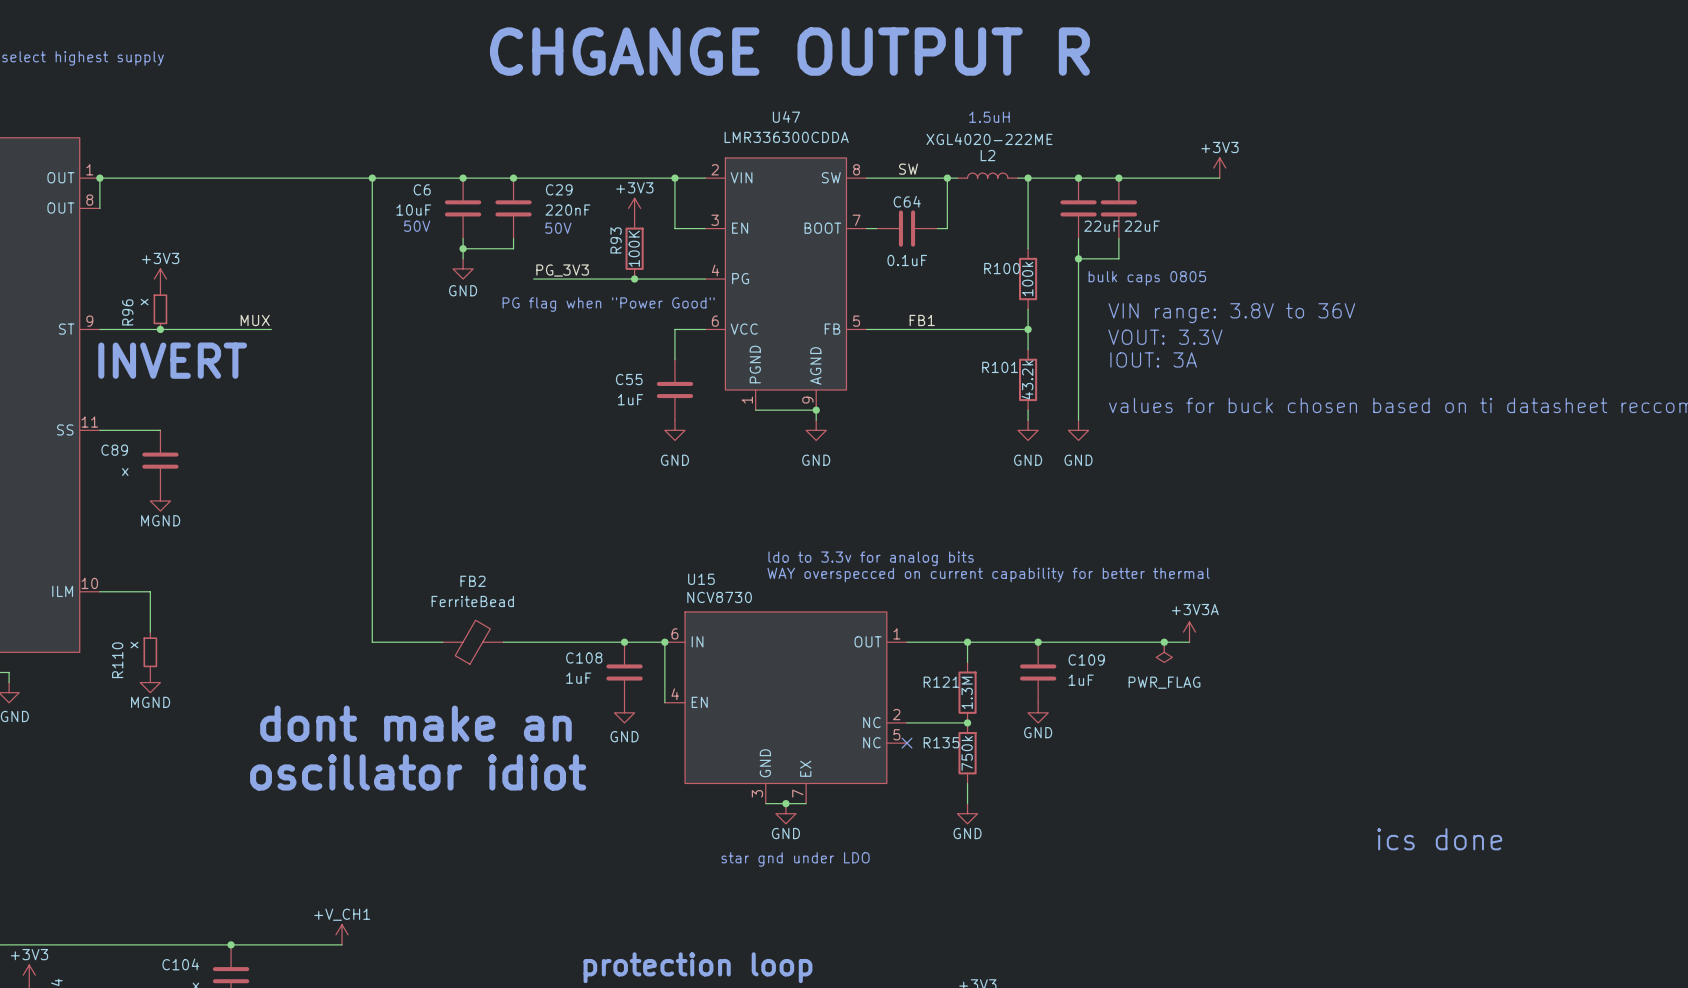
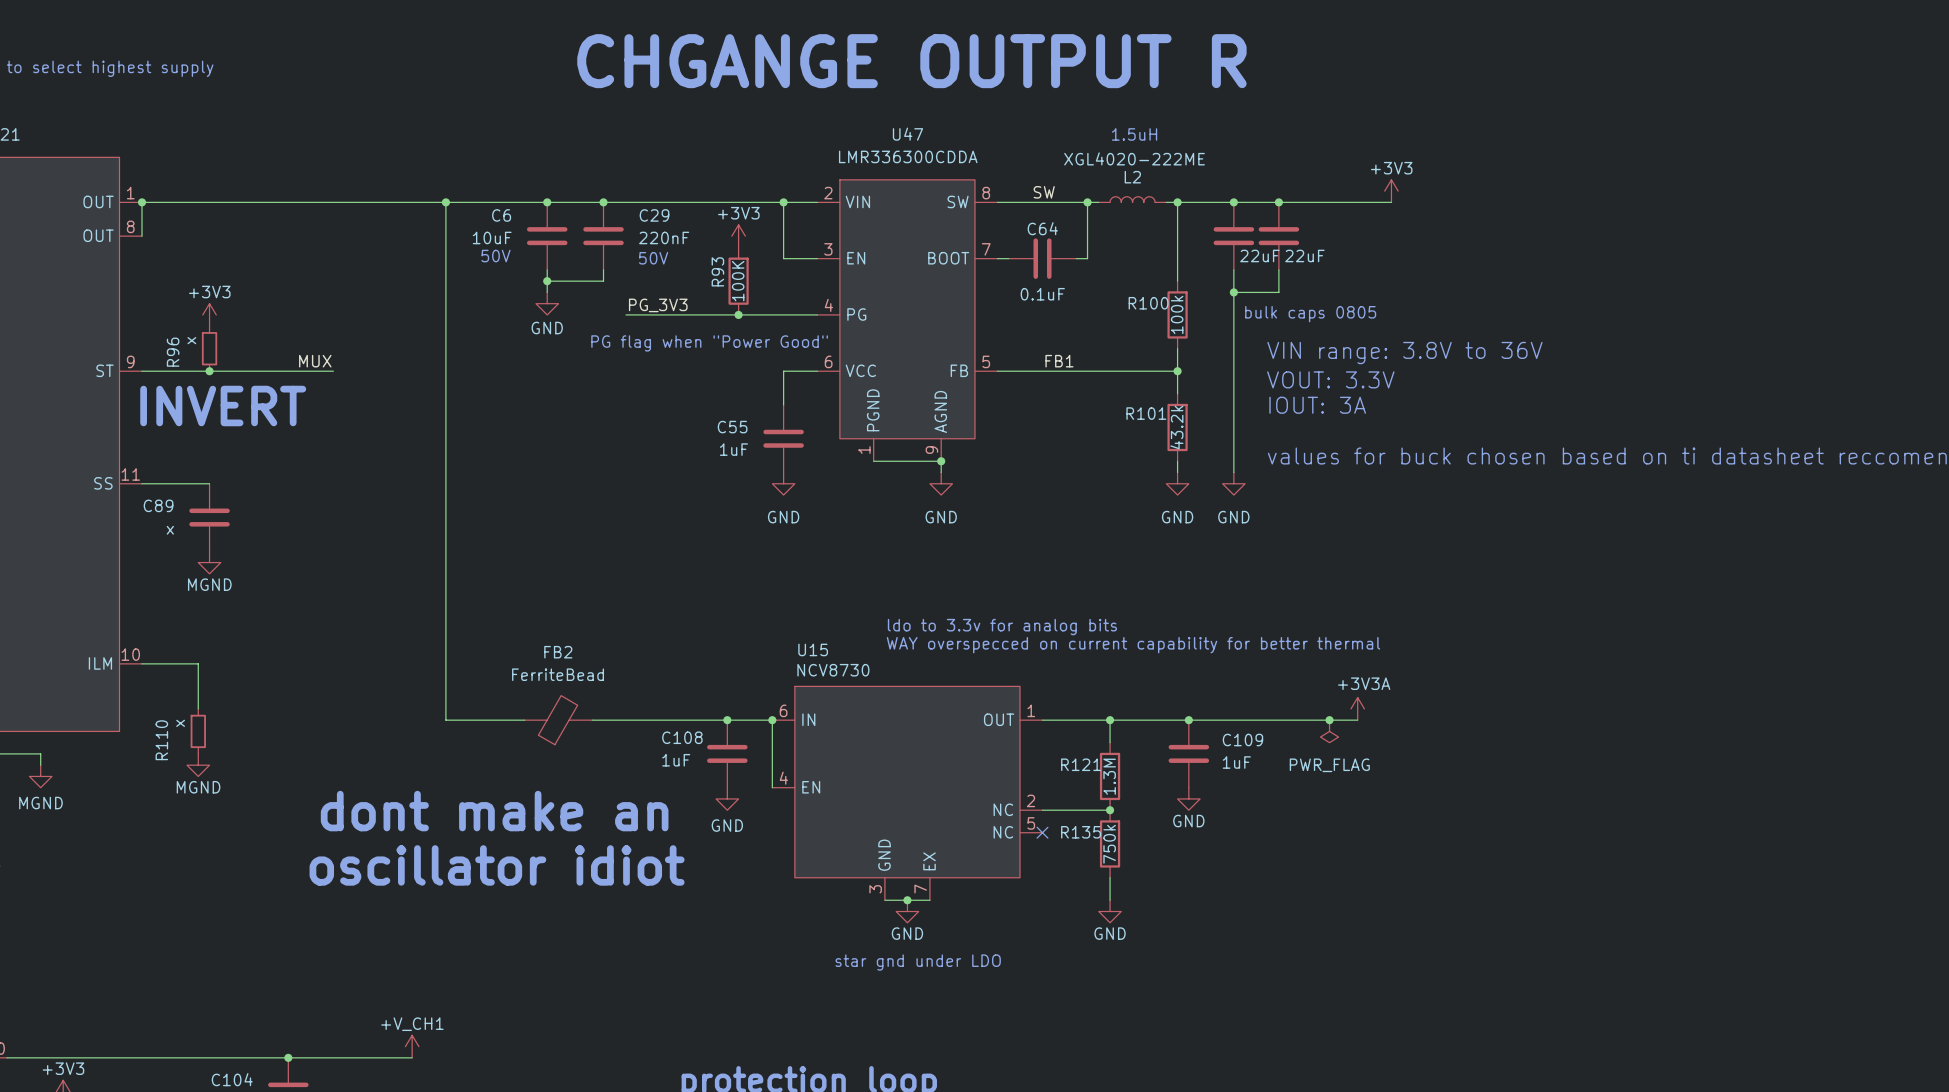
text: ics done (1439, 839) -> none

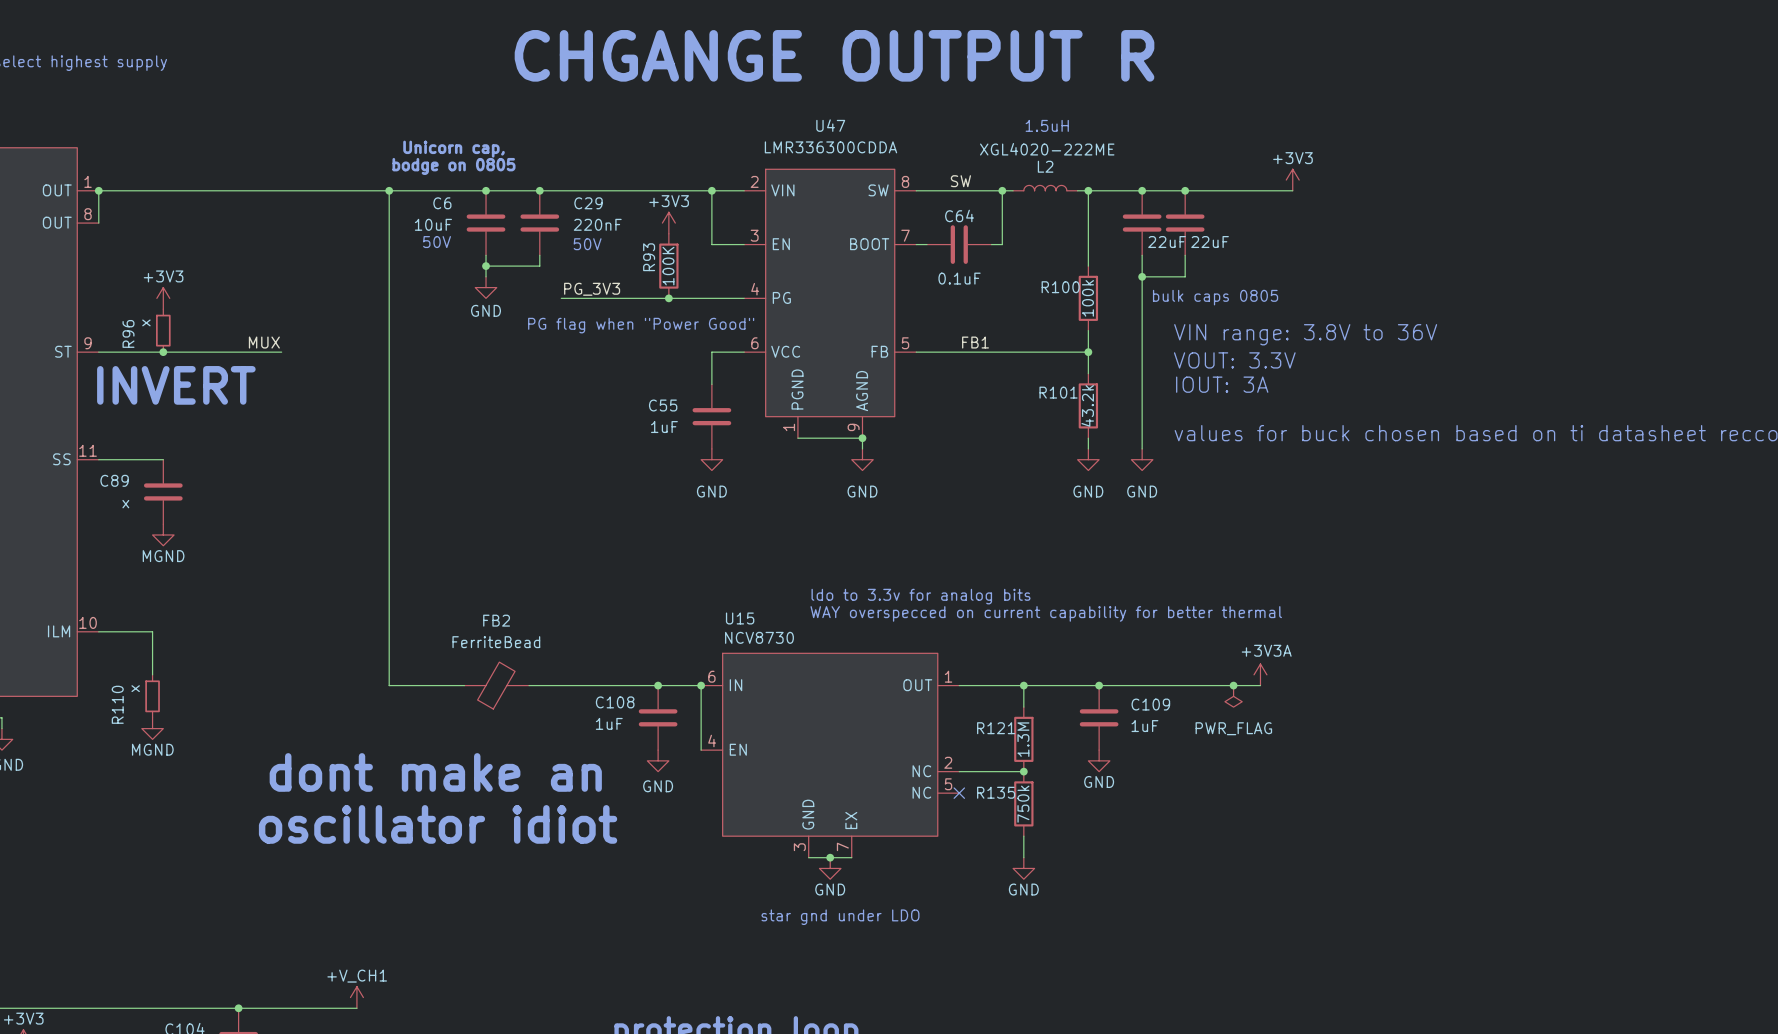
text: none -> Unicorn cap, (453, 149)
text: none -> bodge on 0805 (453, 166)

